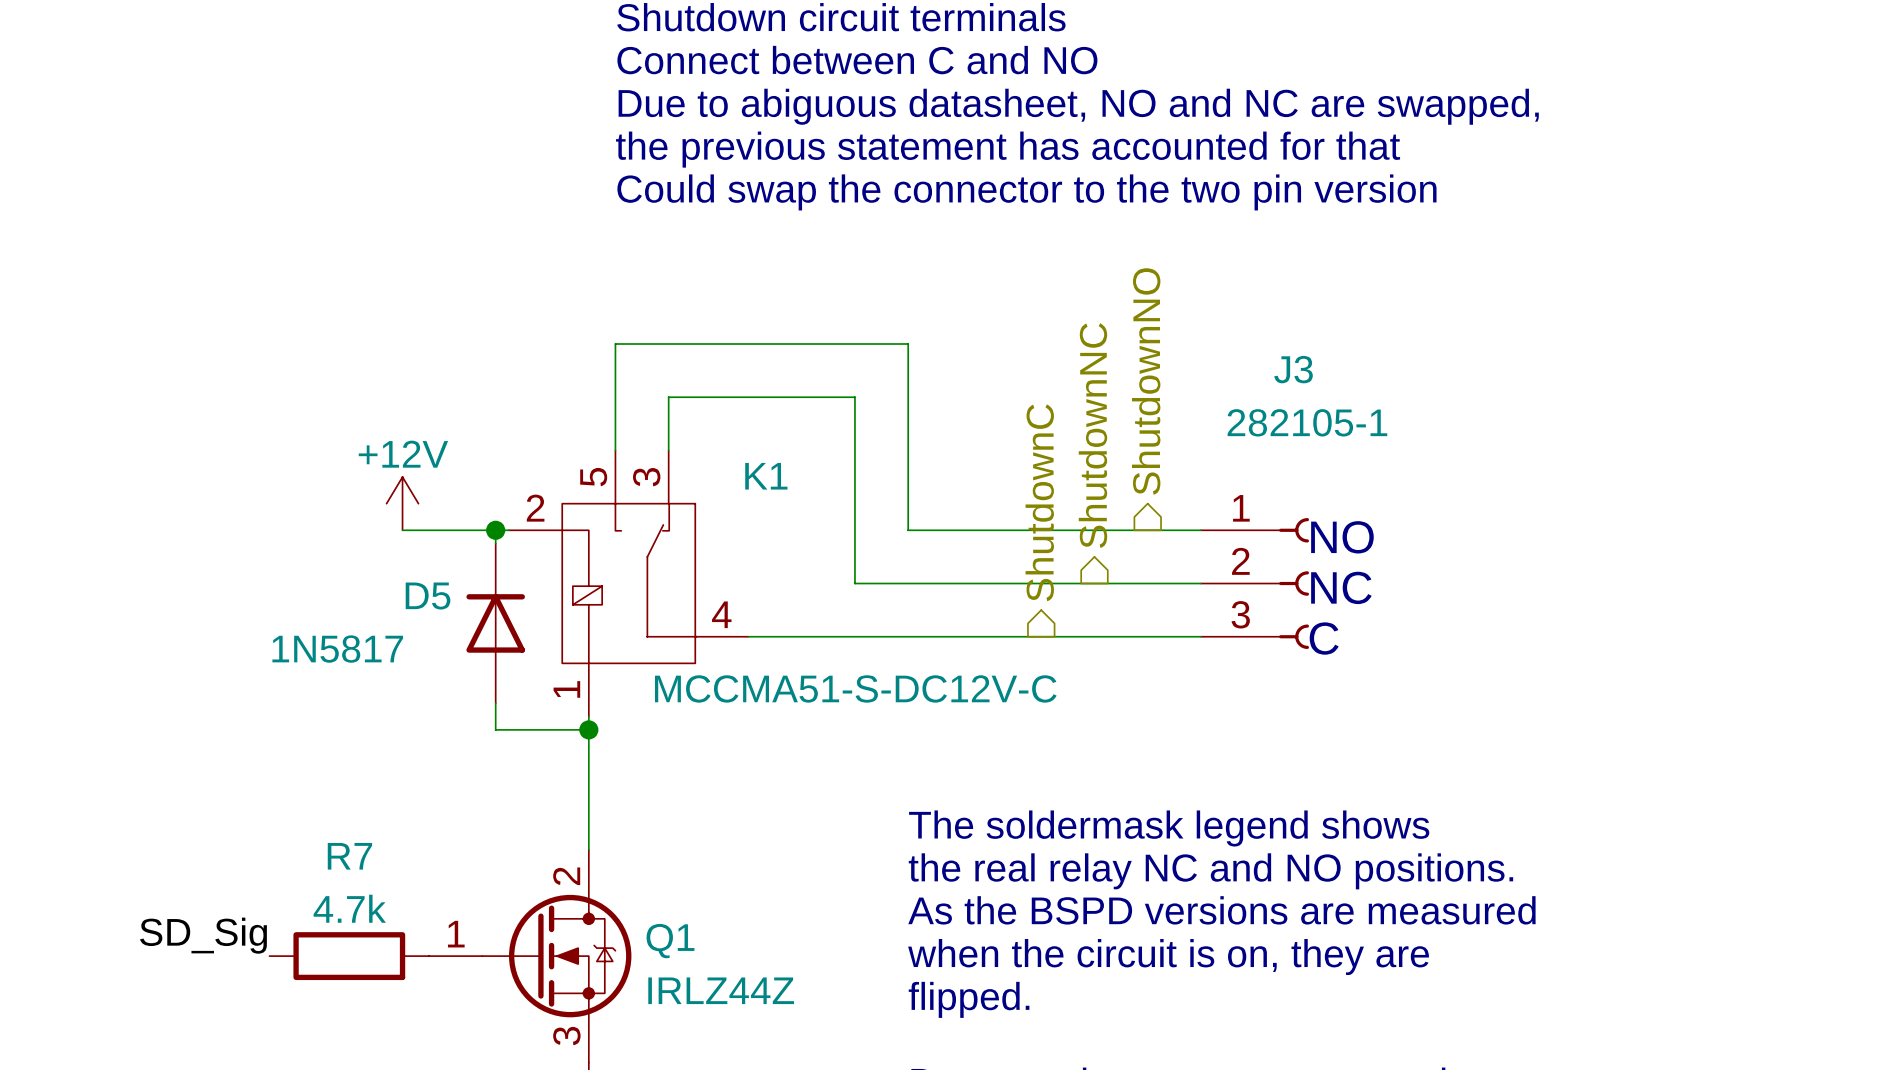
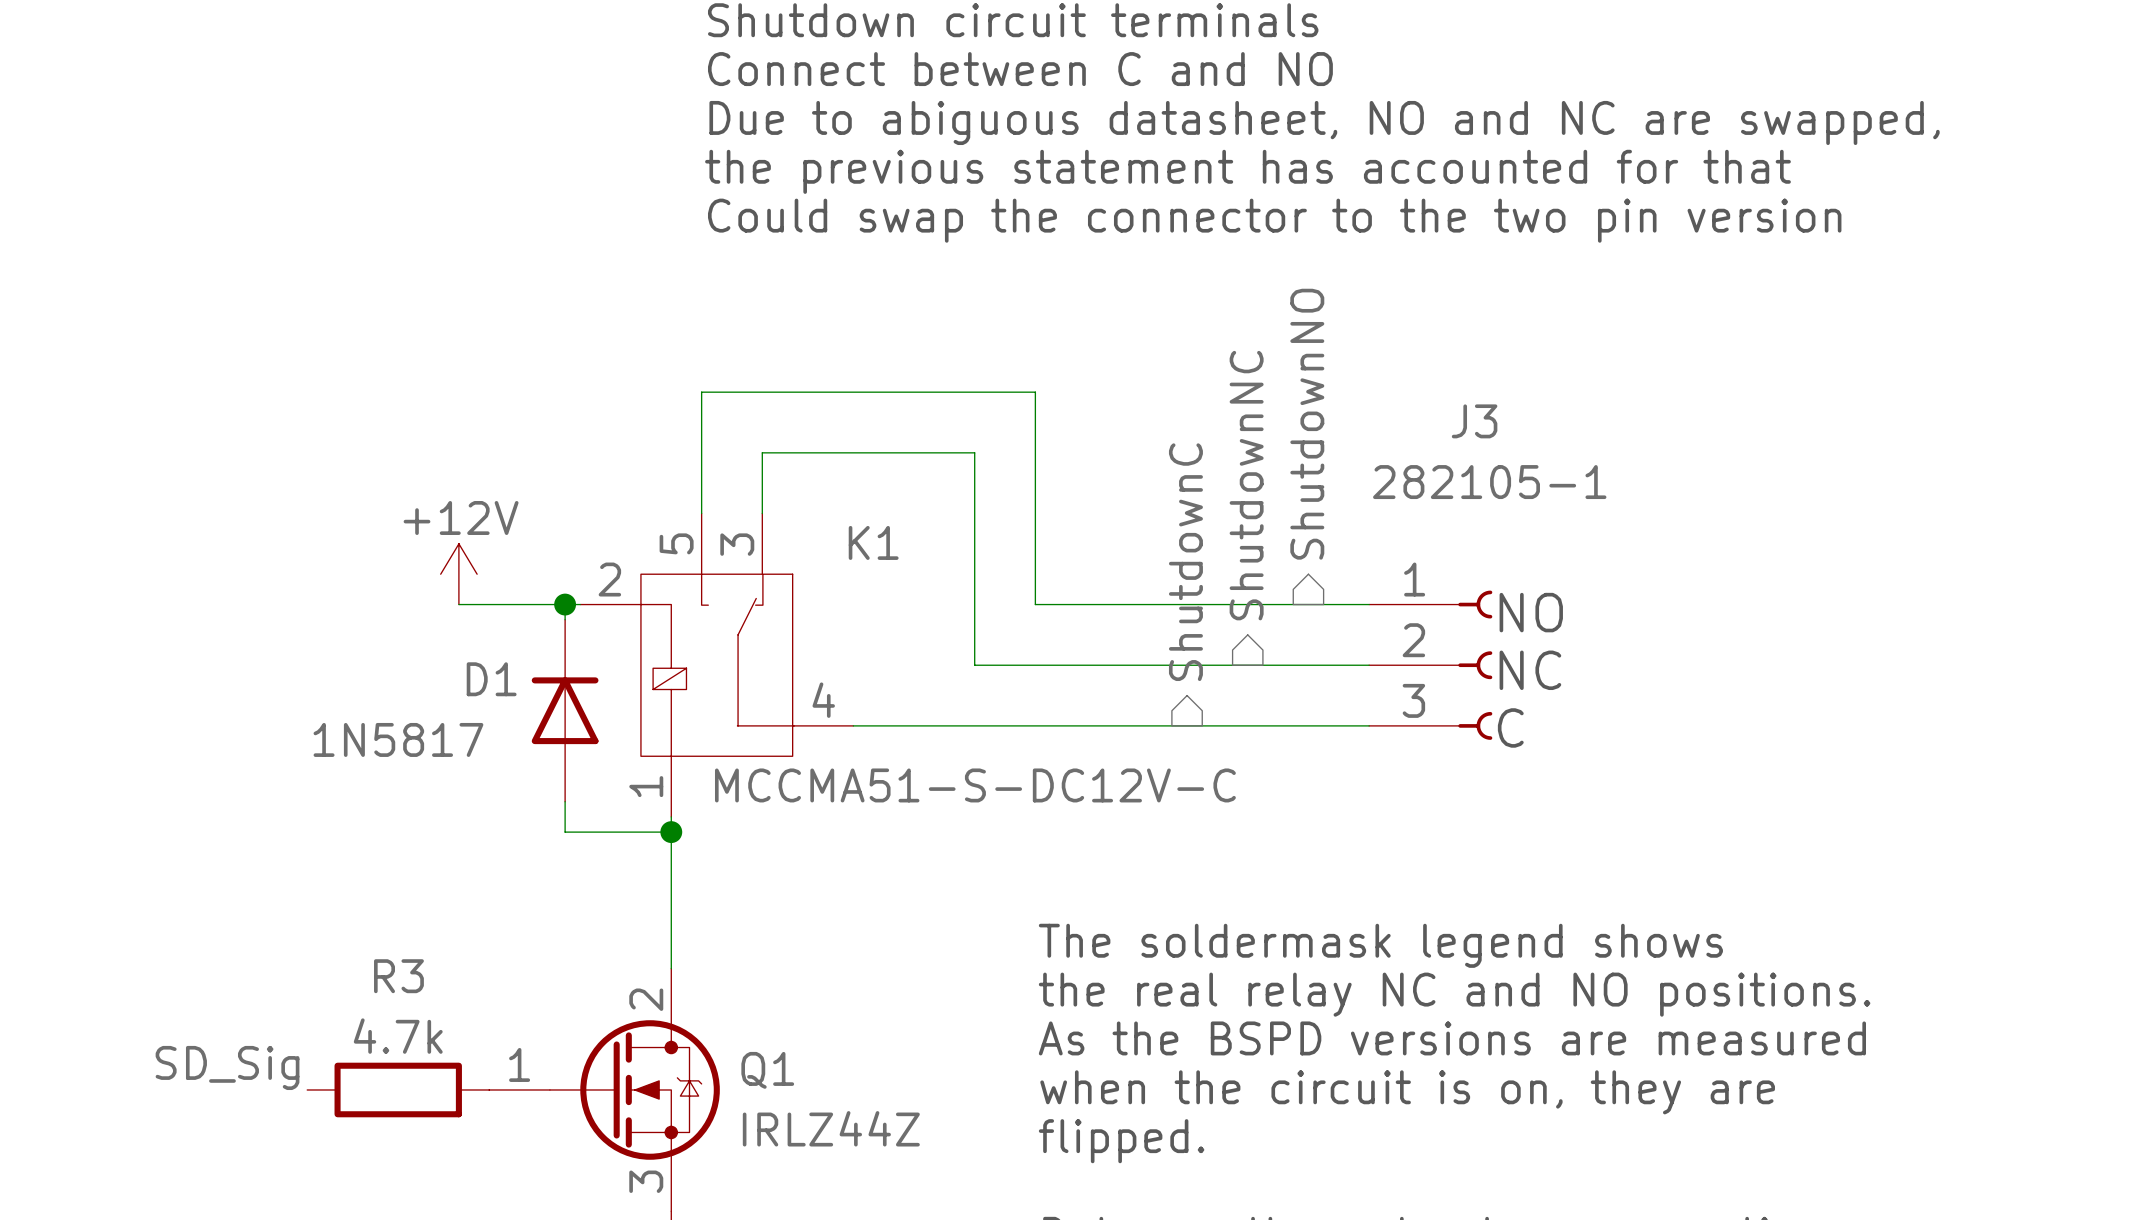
D5 name: D5 (428, 596) -> D1 (491, 679)
R7 name: R7 (349, 856) -> R3 (398, 976)

